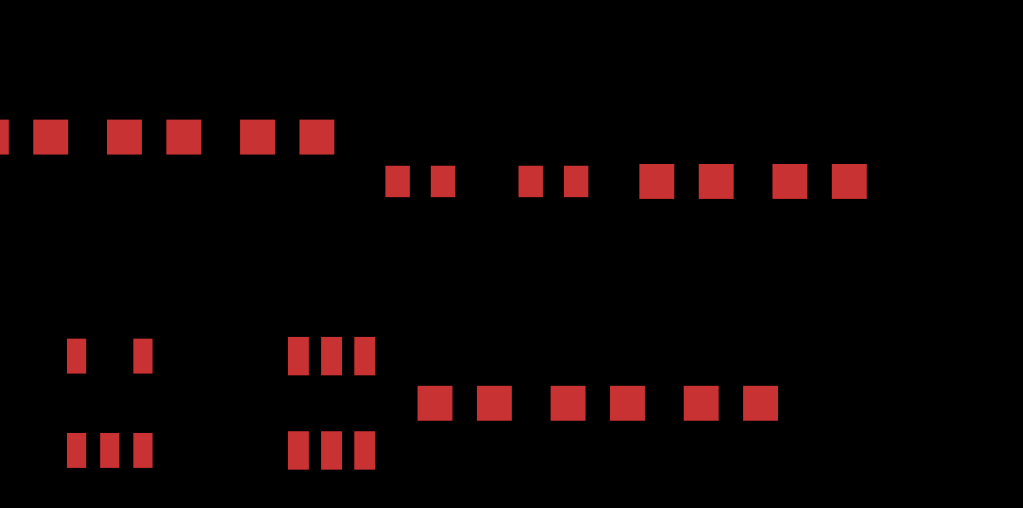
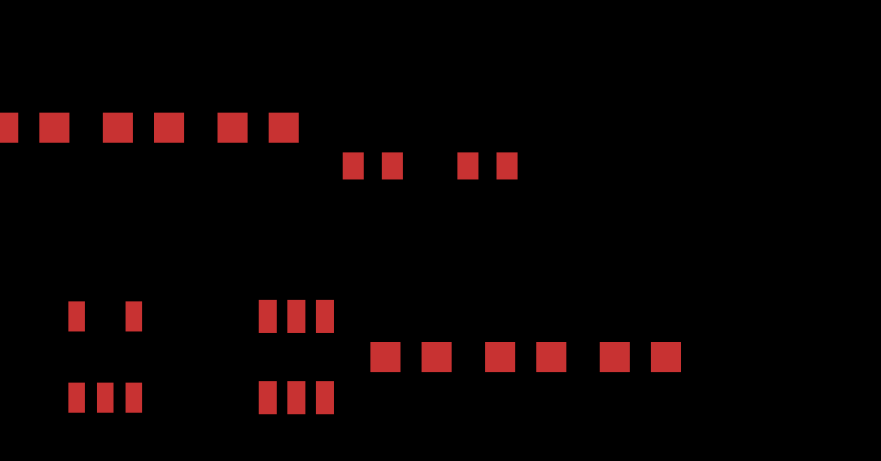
part: (686, 181) -> none
part: (819, 181) -> none

